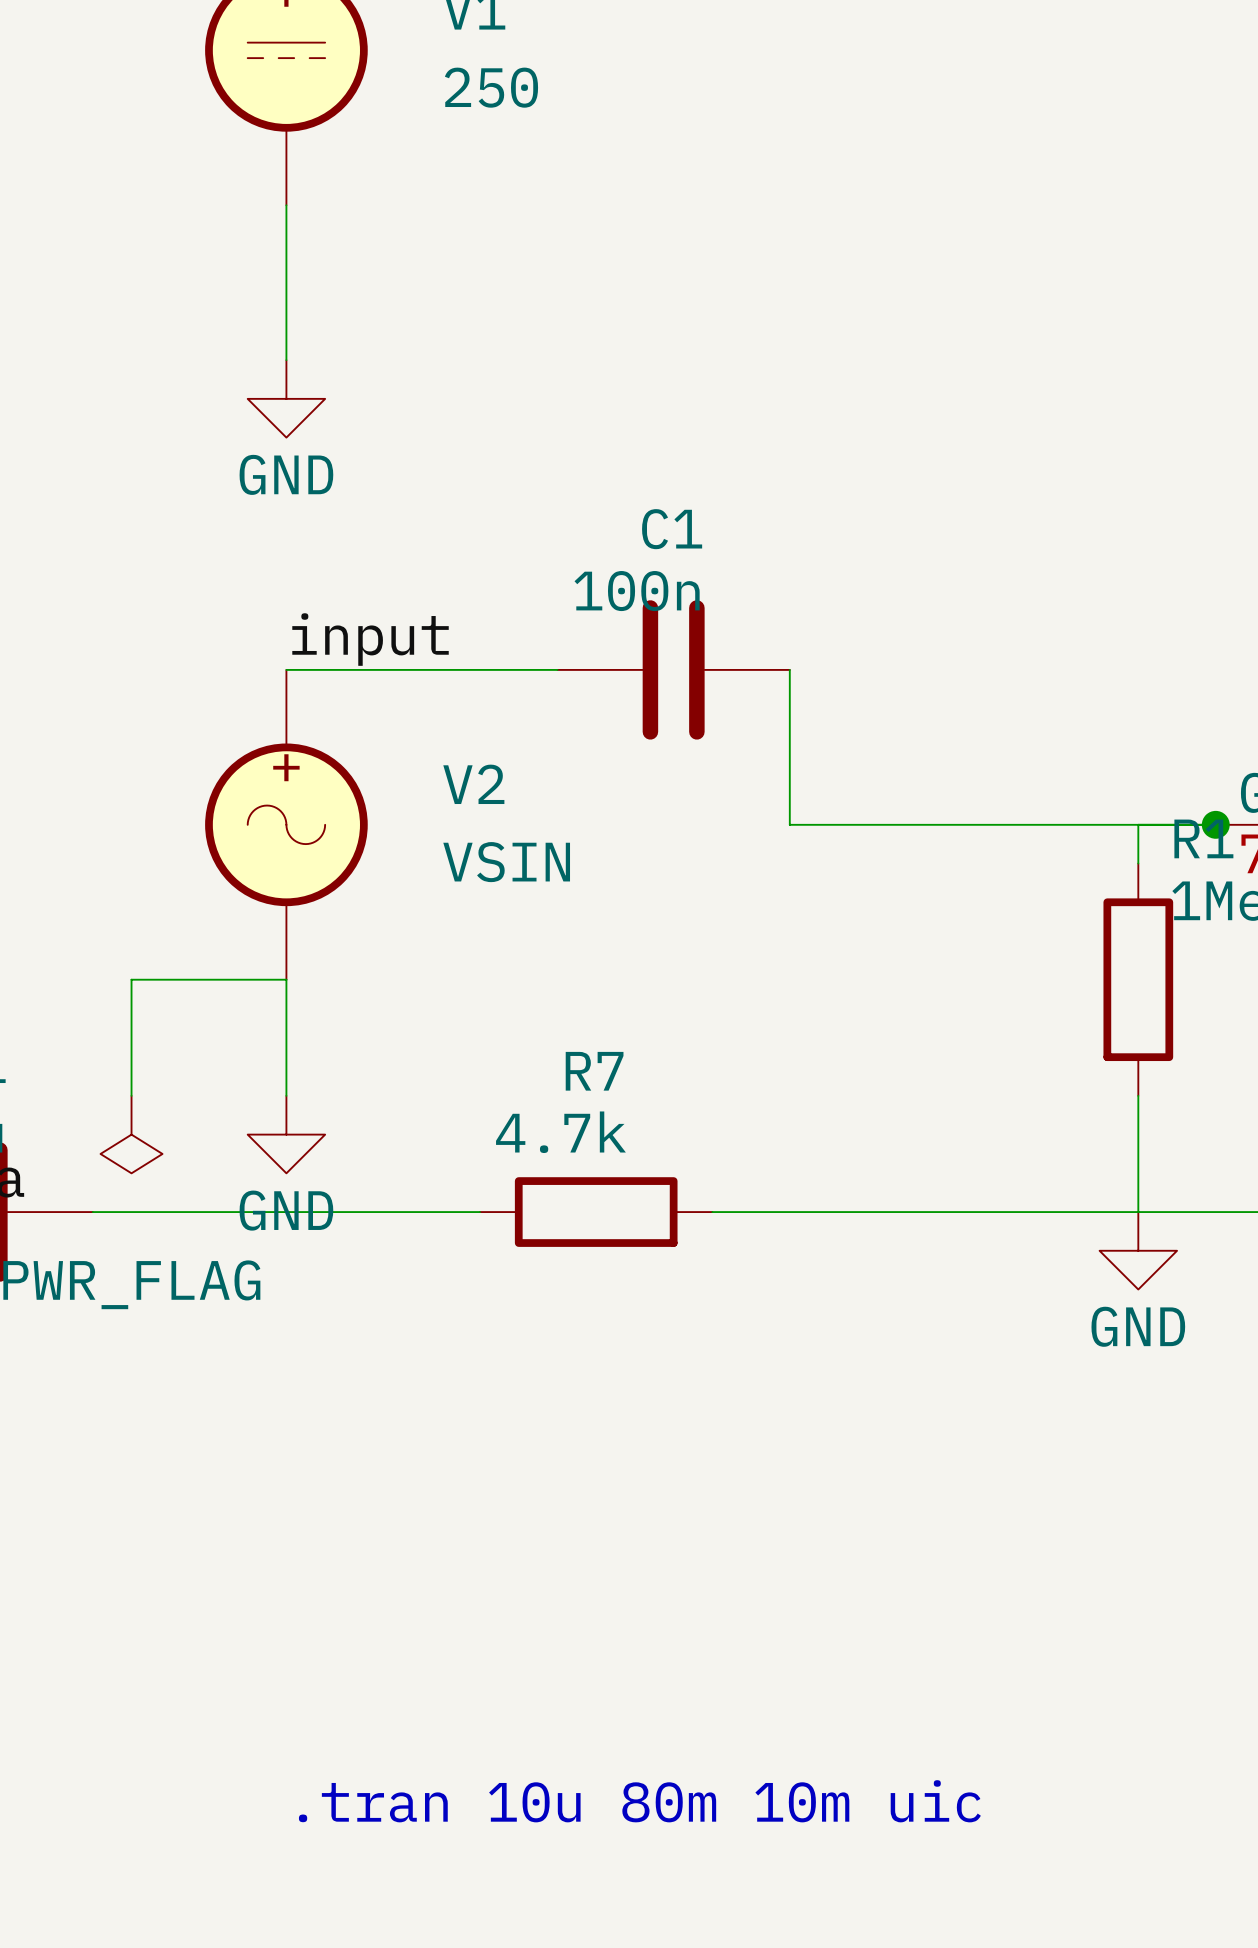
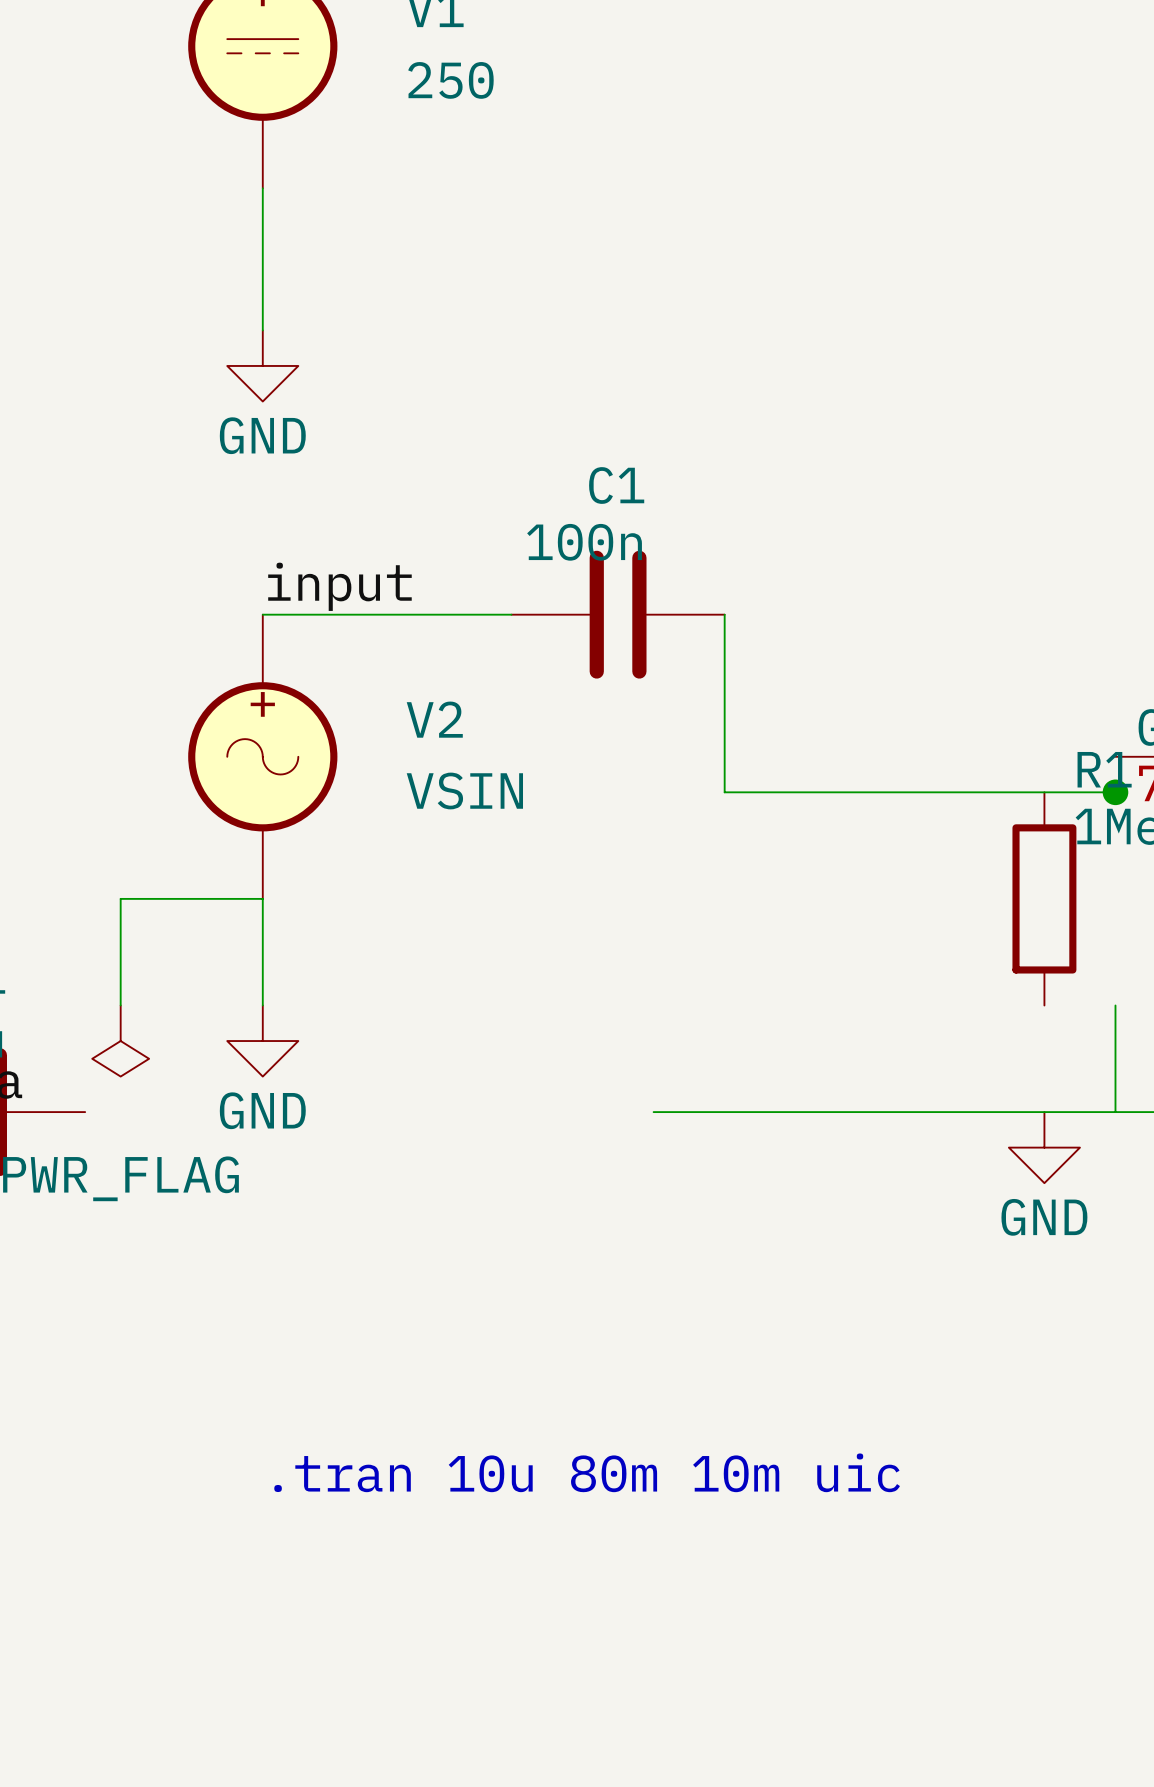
wire: (789, 824) (1215, 824) -> (724, 756) (724, 792) (1115, 792)
wire: (1138, 824) (1138, 863) -> none
junction position: (1215, 824) -> (1115, 792)
wire: (1138, 1095) (1138, 1212) -> (1115, 1005) (1115, 1112)
wire: (92, 1212) (480, 1212) -> none
R7: 4.7k (596, 1212) -> none
text position: .tran 10u 80m 10m uic (639, 1801) -> .tran 10u 80m 10m uic (587, 1472)

